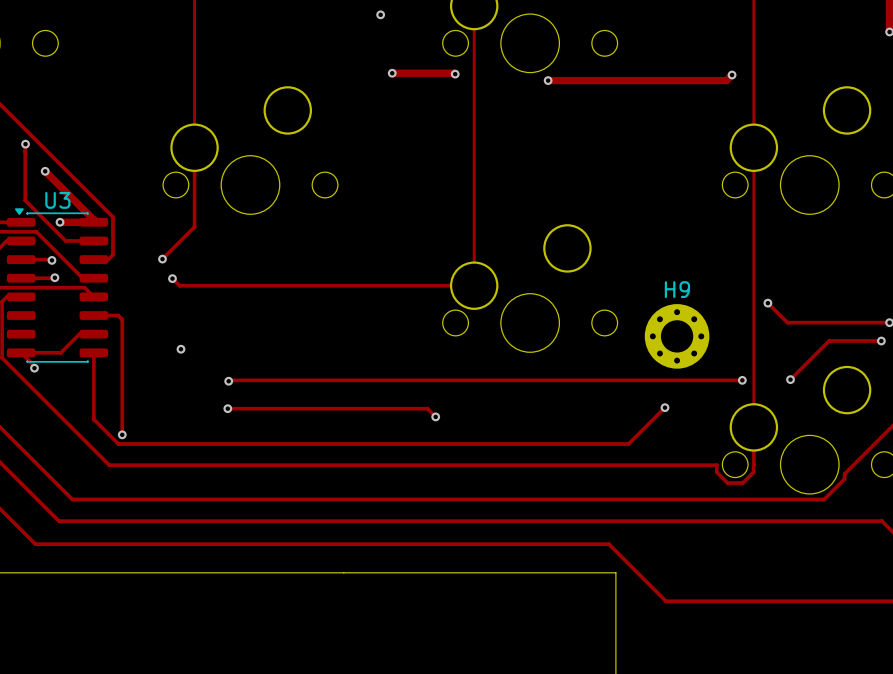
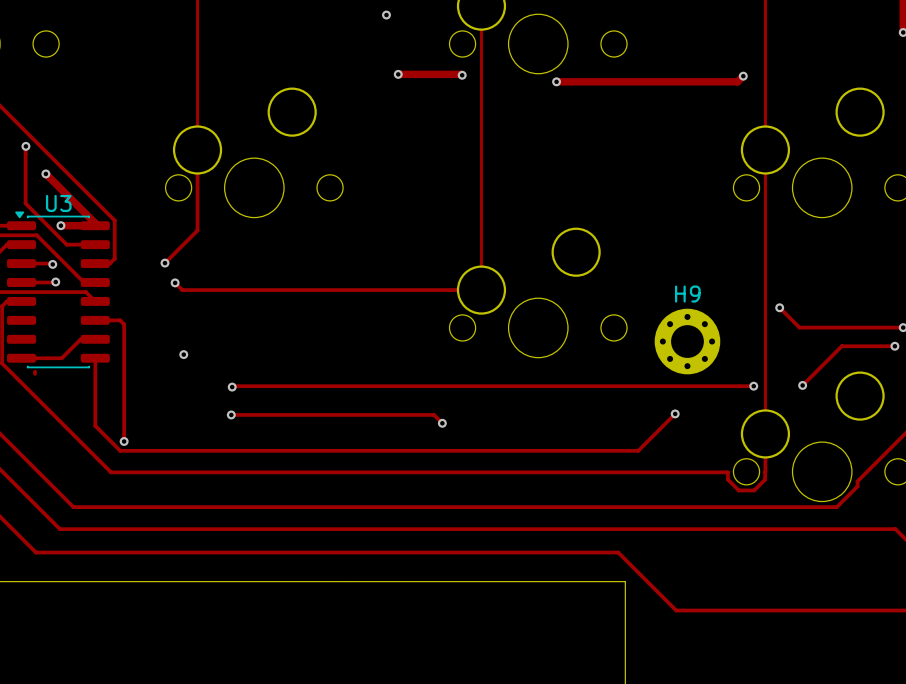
track: (21, 352) (34, 366) -> none
via: (34, 368) -> none

